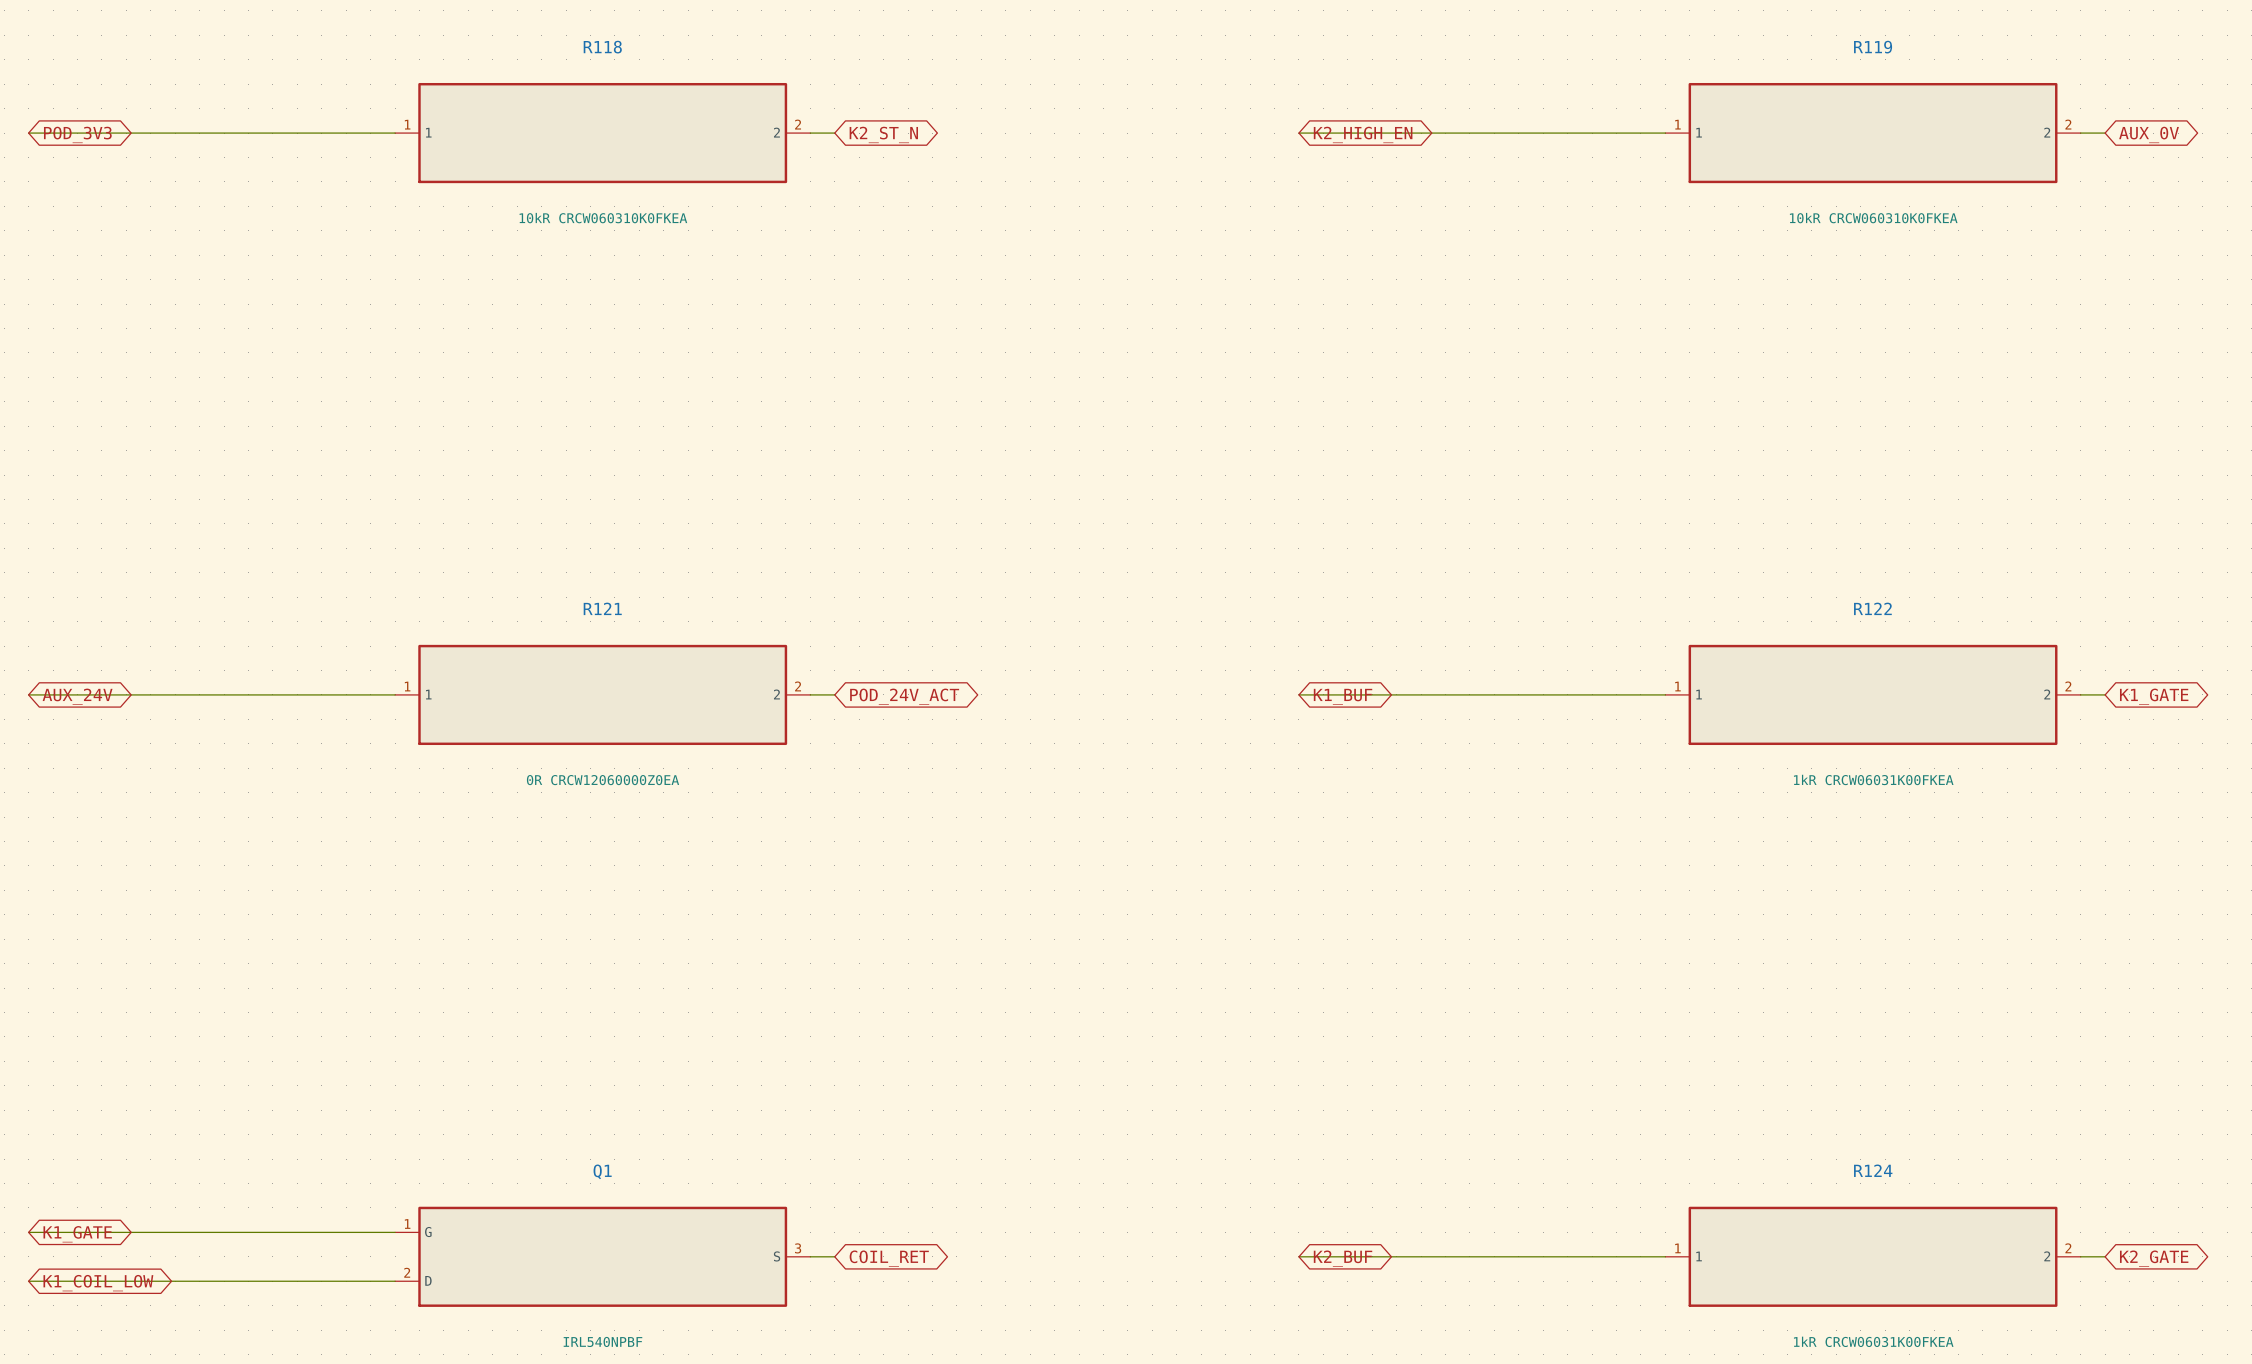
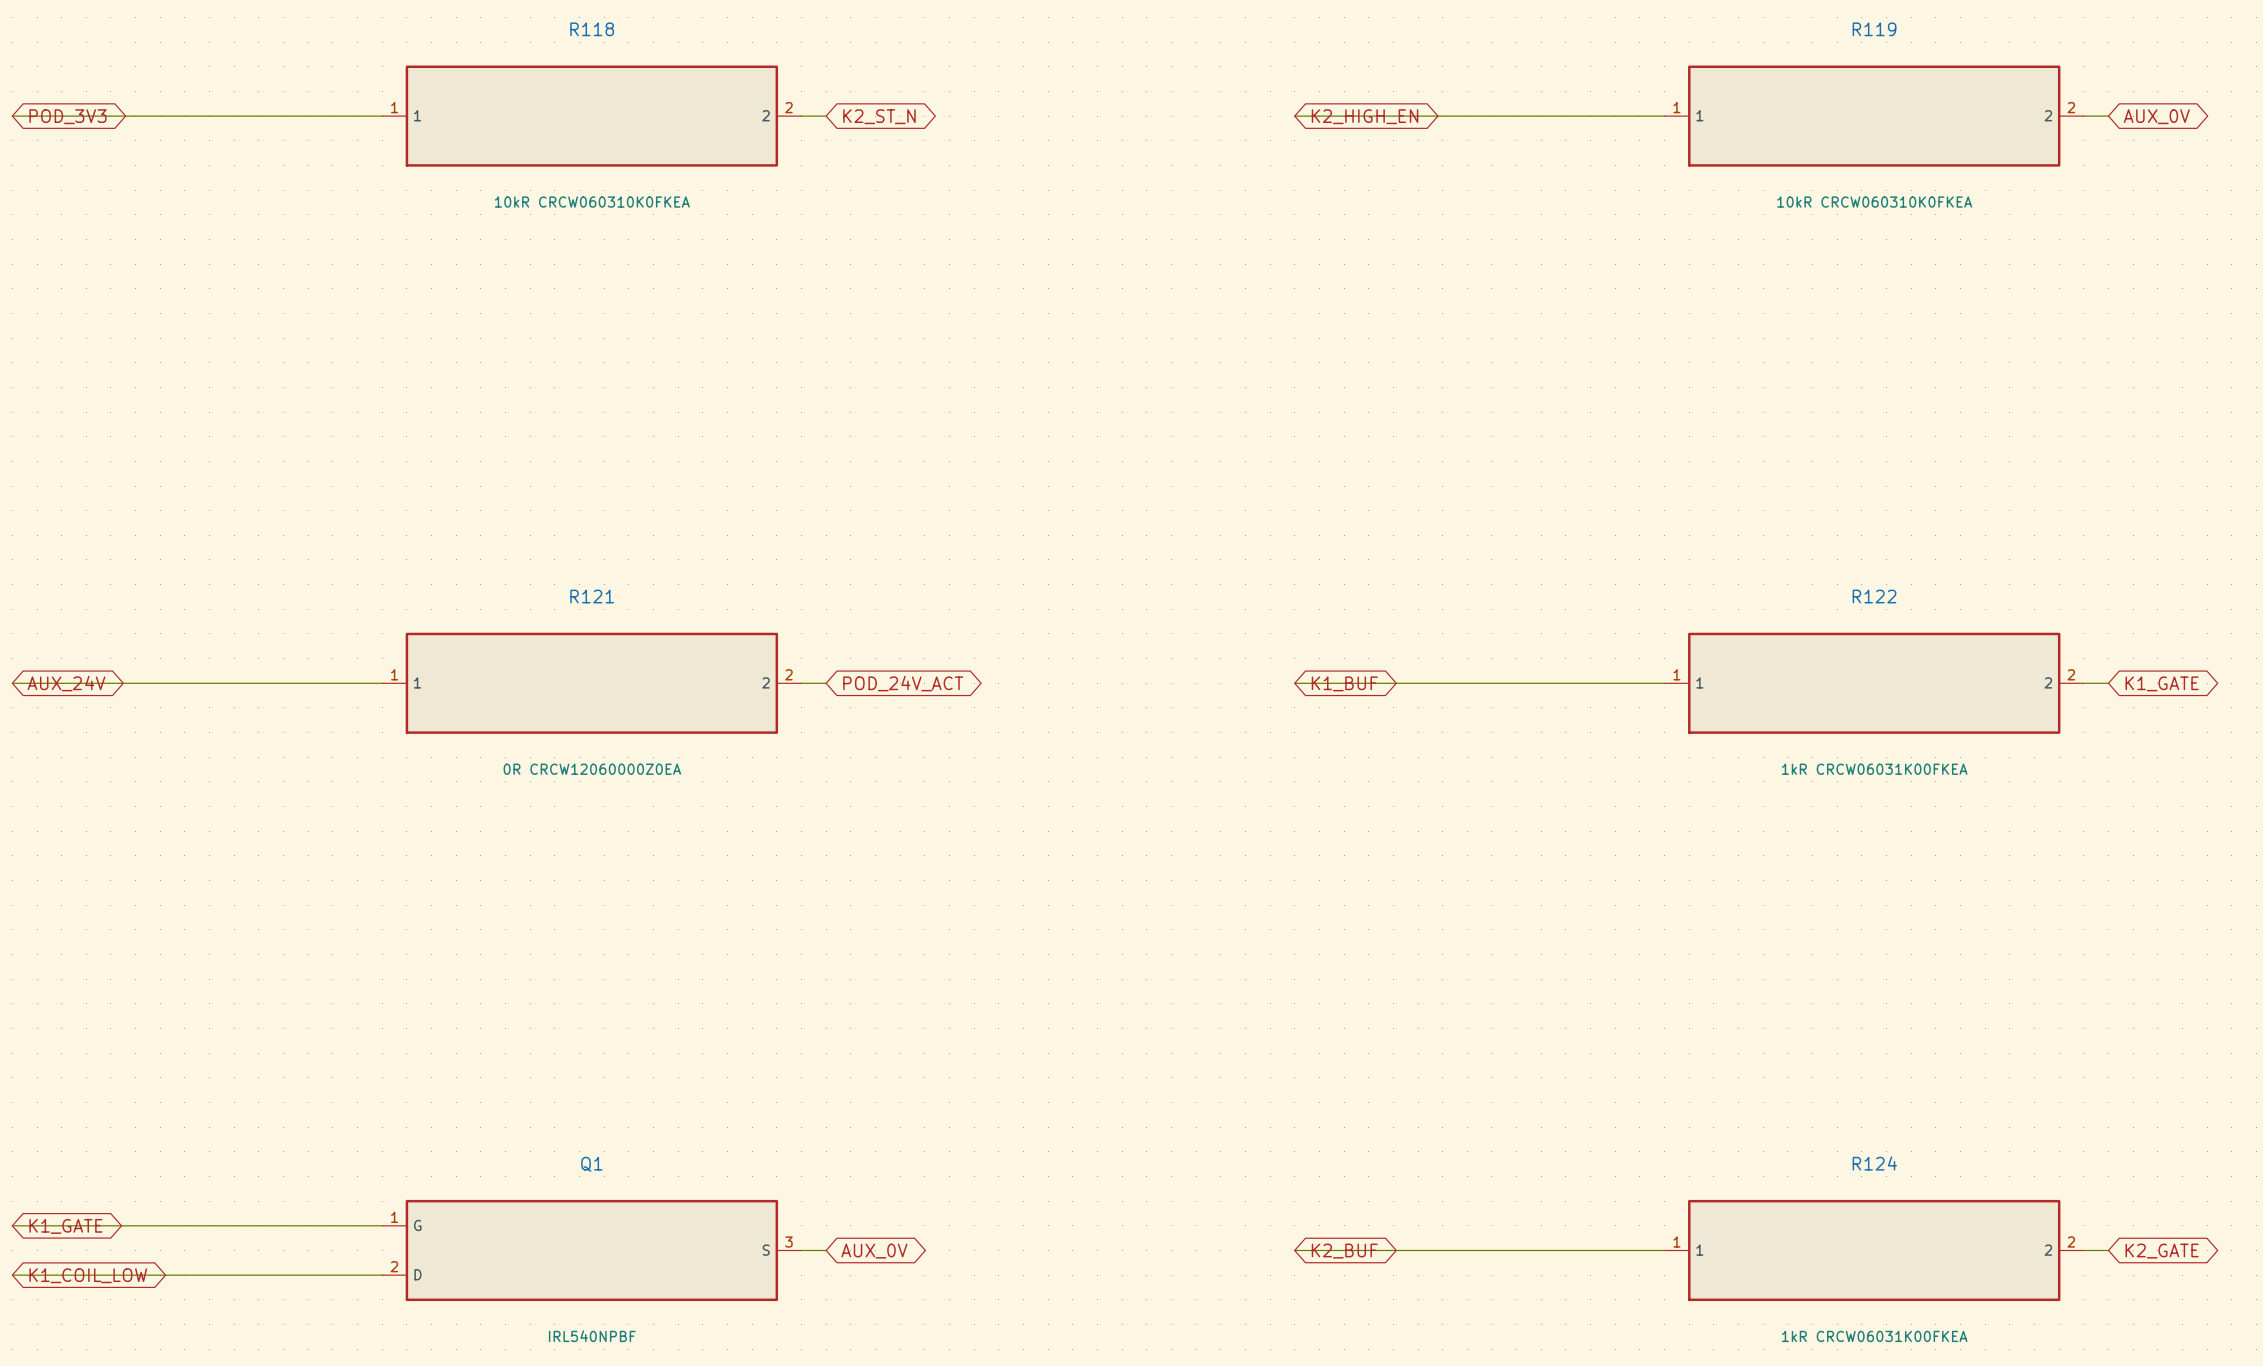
global label: COIL_RET (889, 1258) -> AUX_0V (874, 1251)

